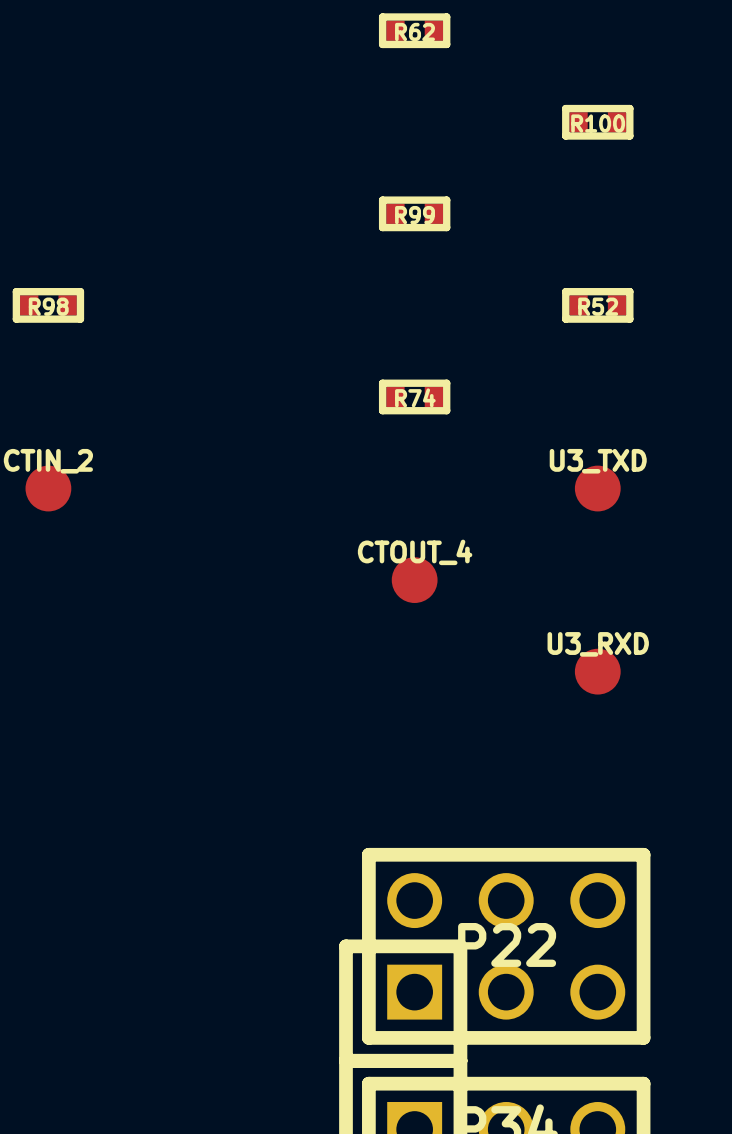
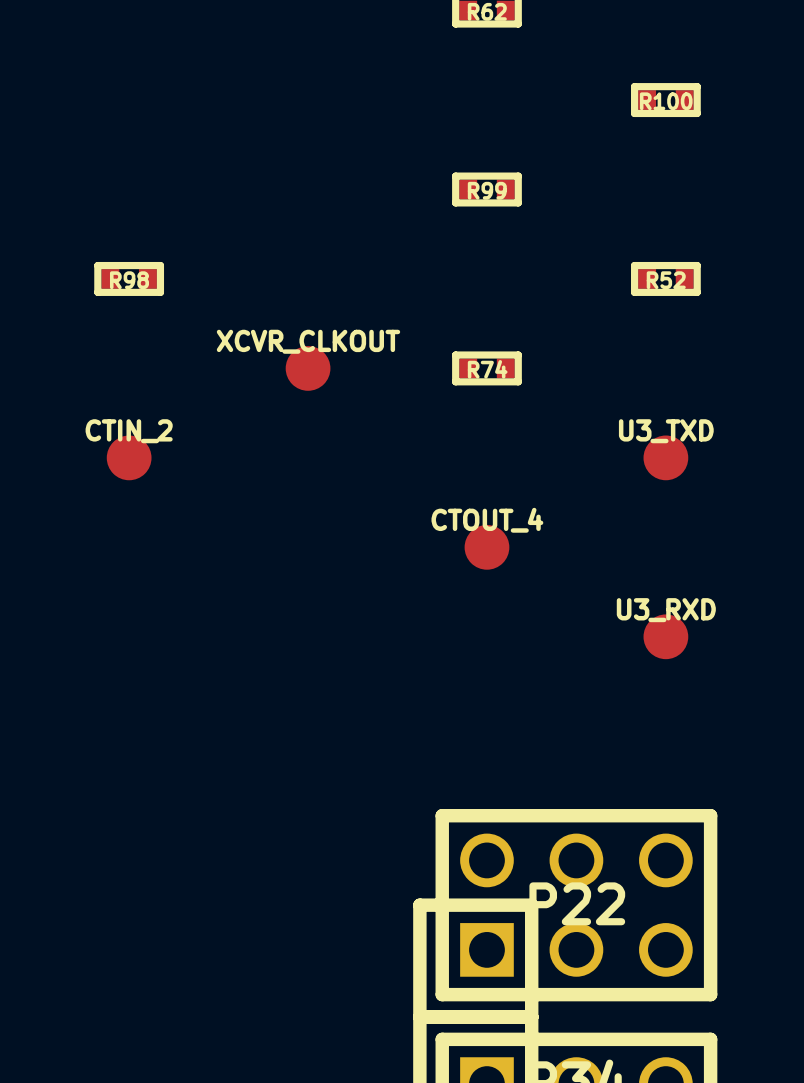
part: none -> XCVR_CLKOUT (308, 368)

